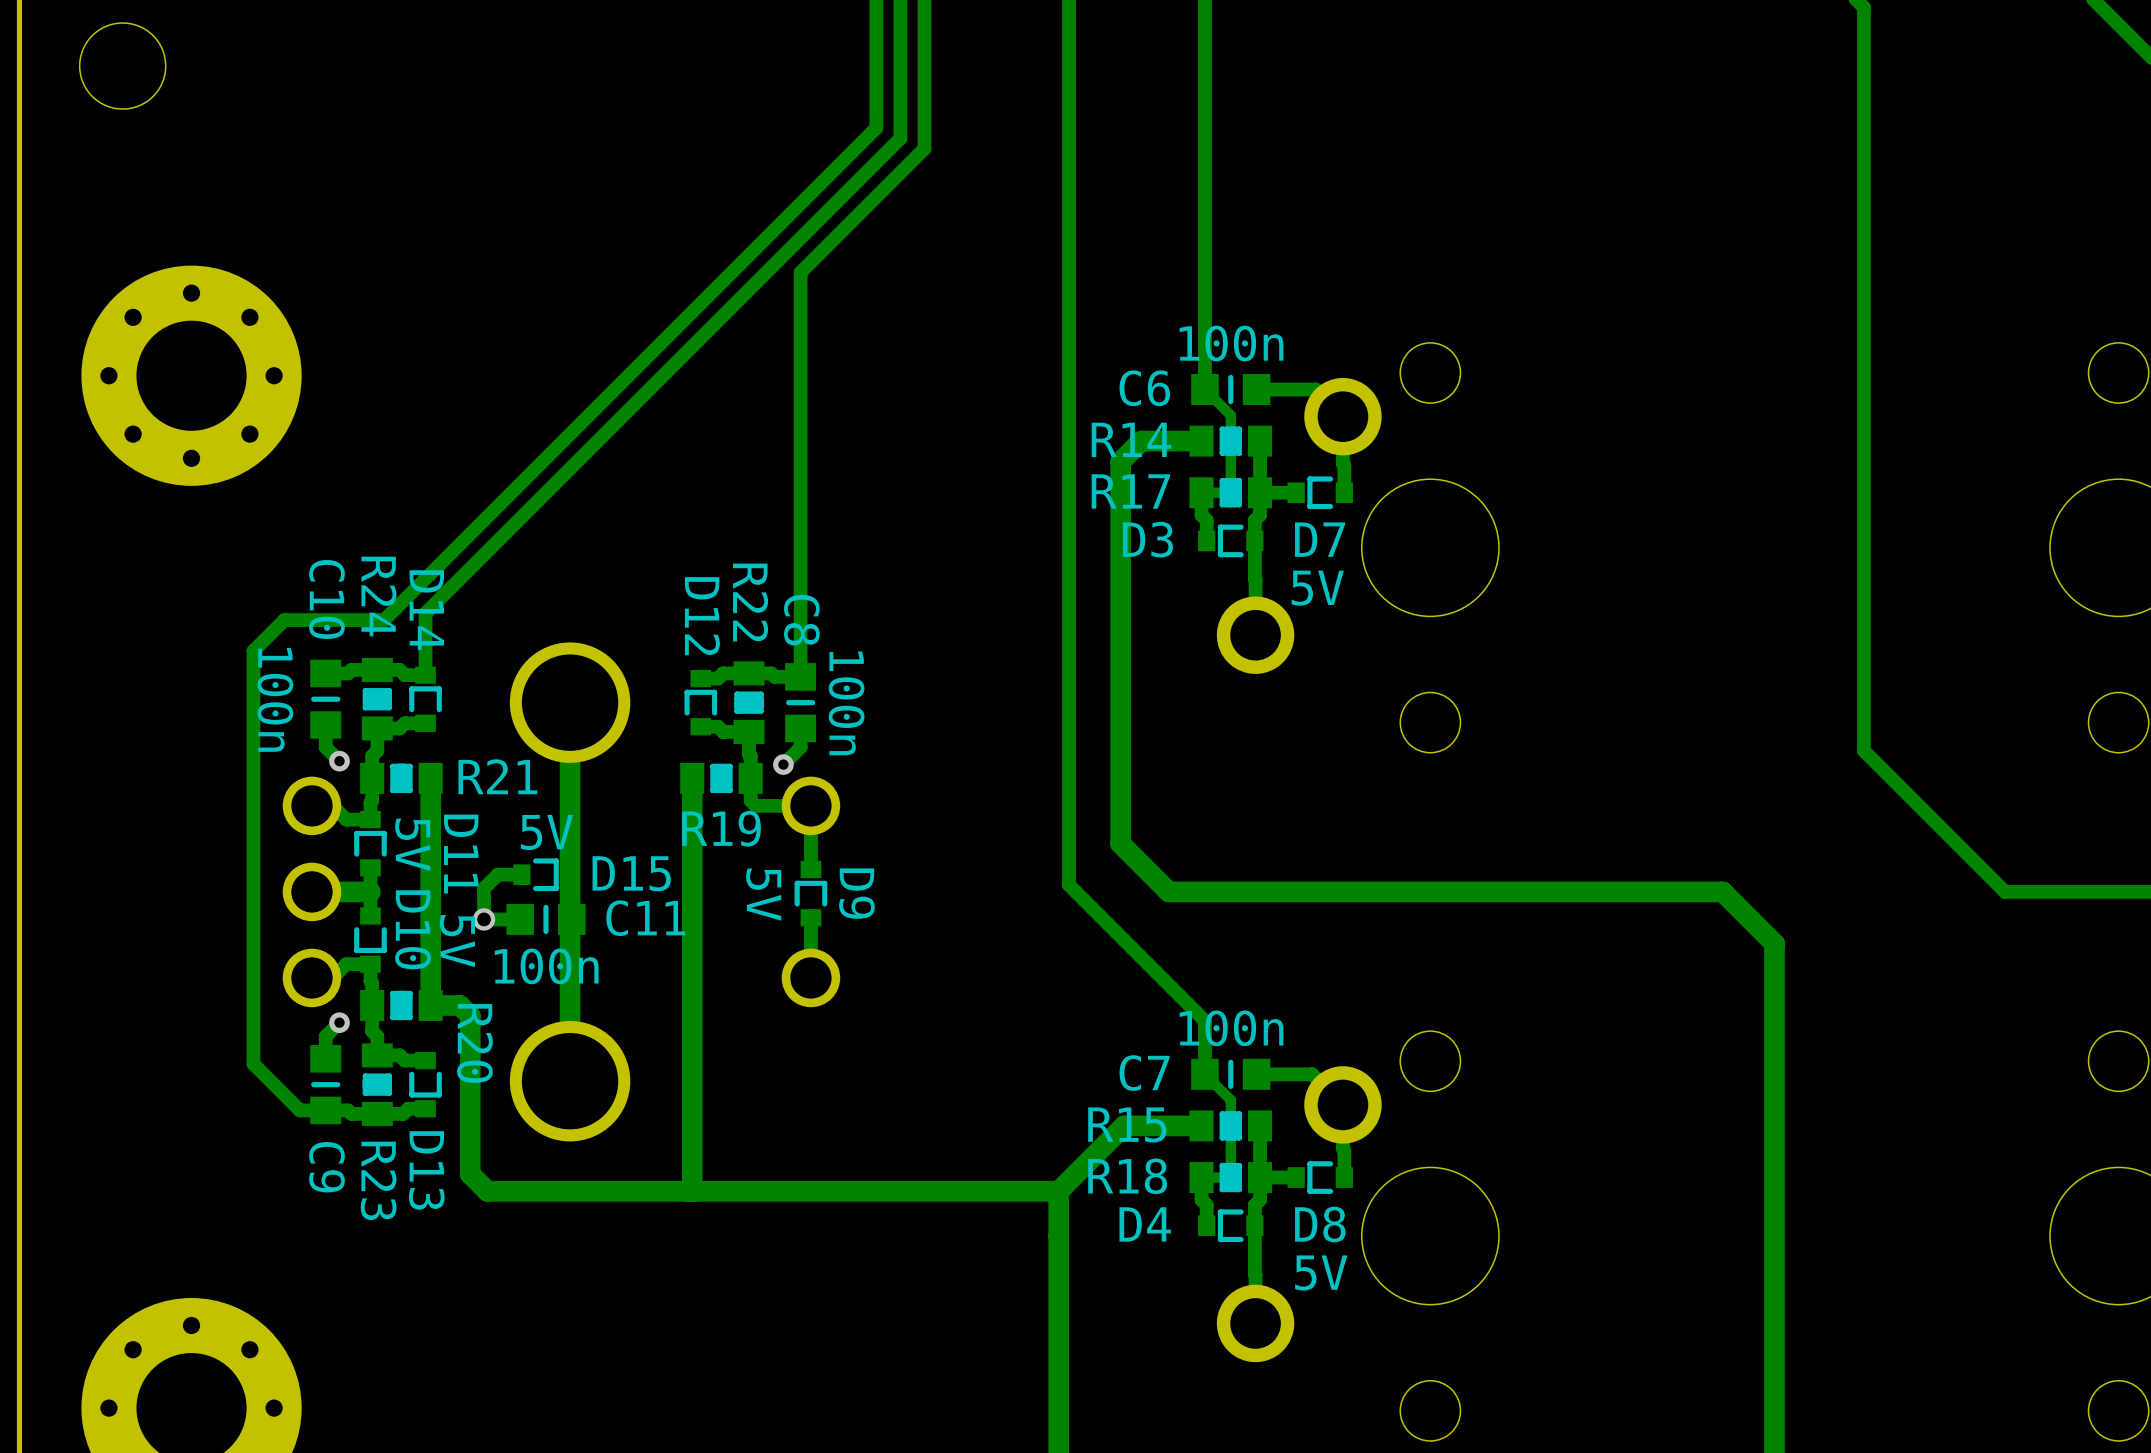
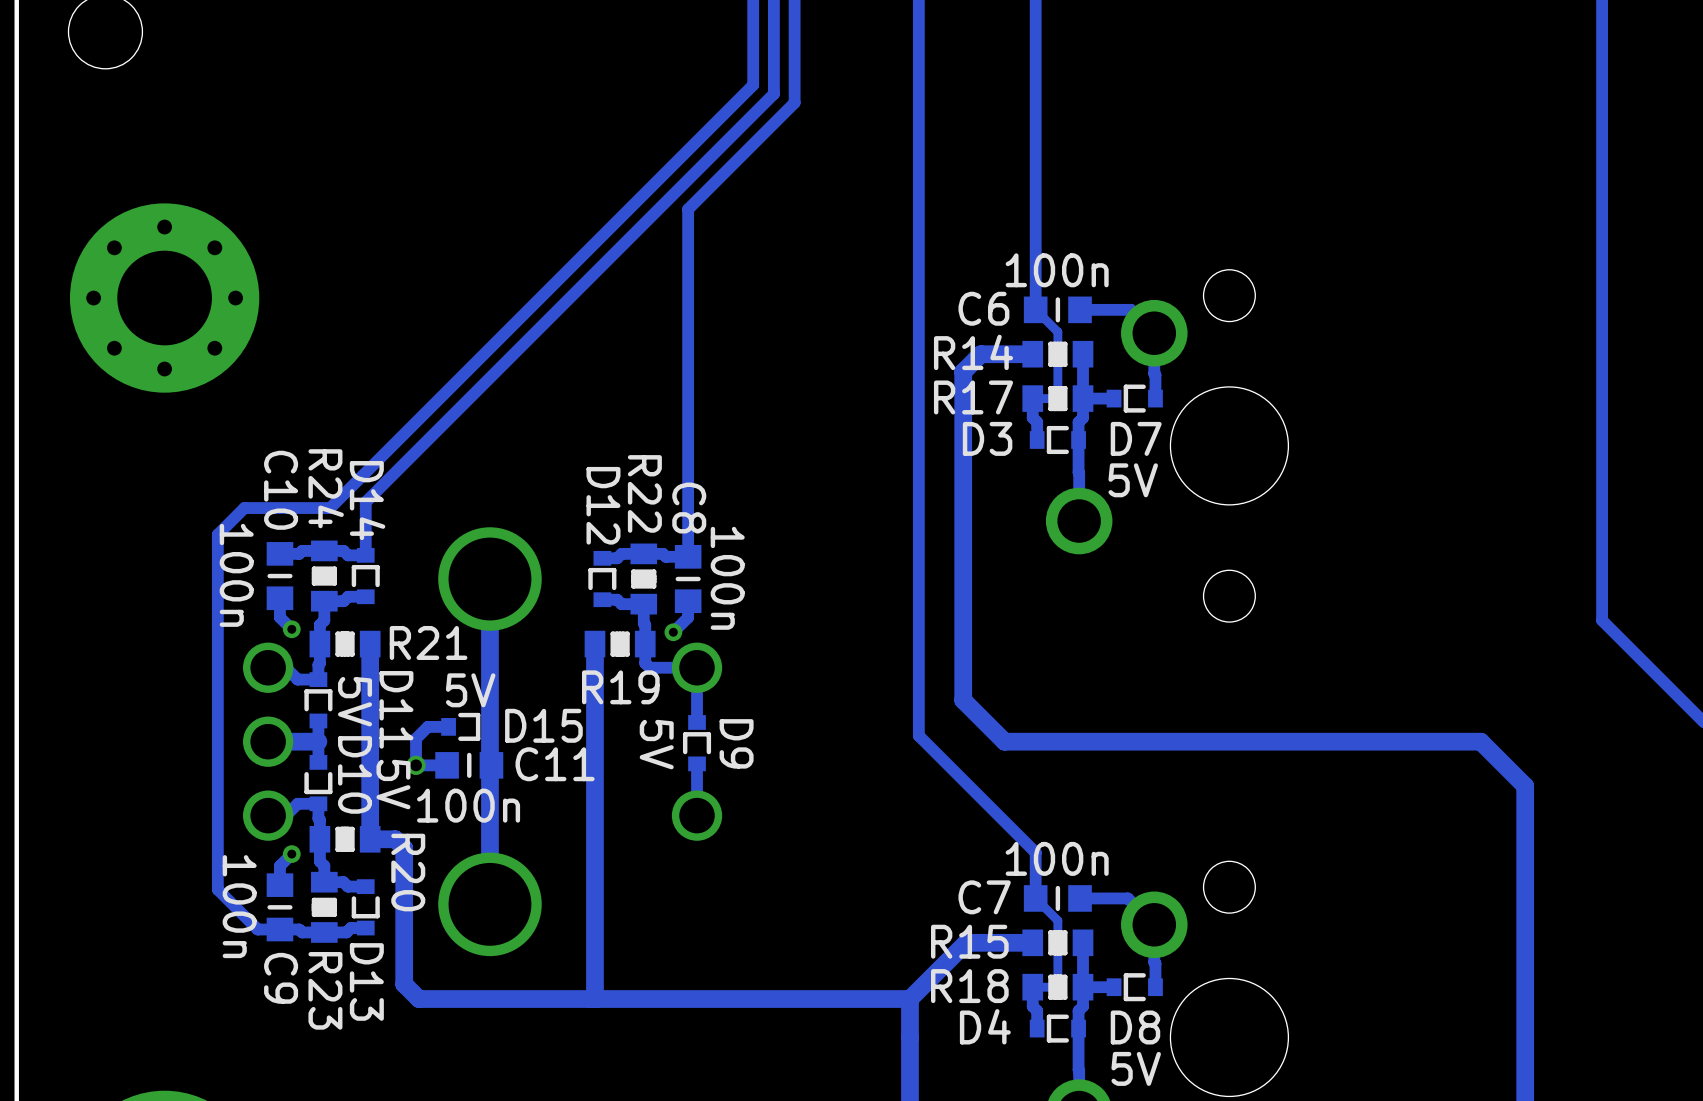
C9 value: none -> 100n (239, 906)

